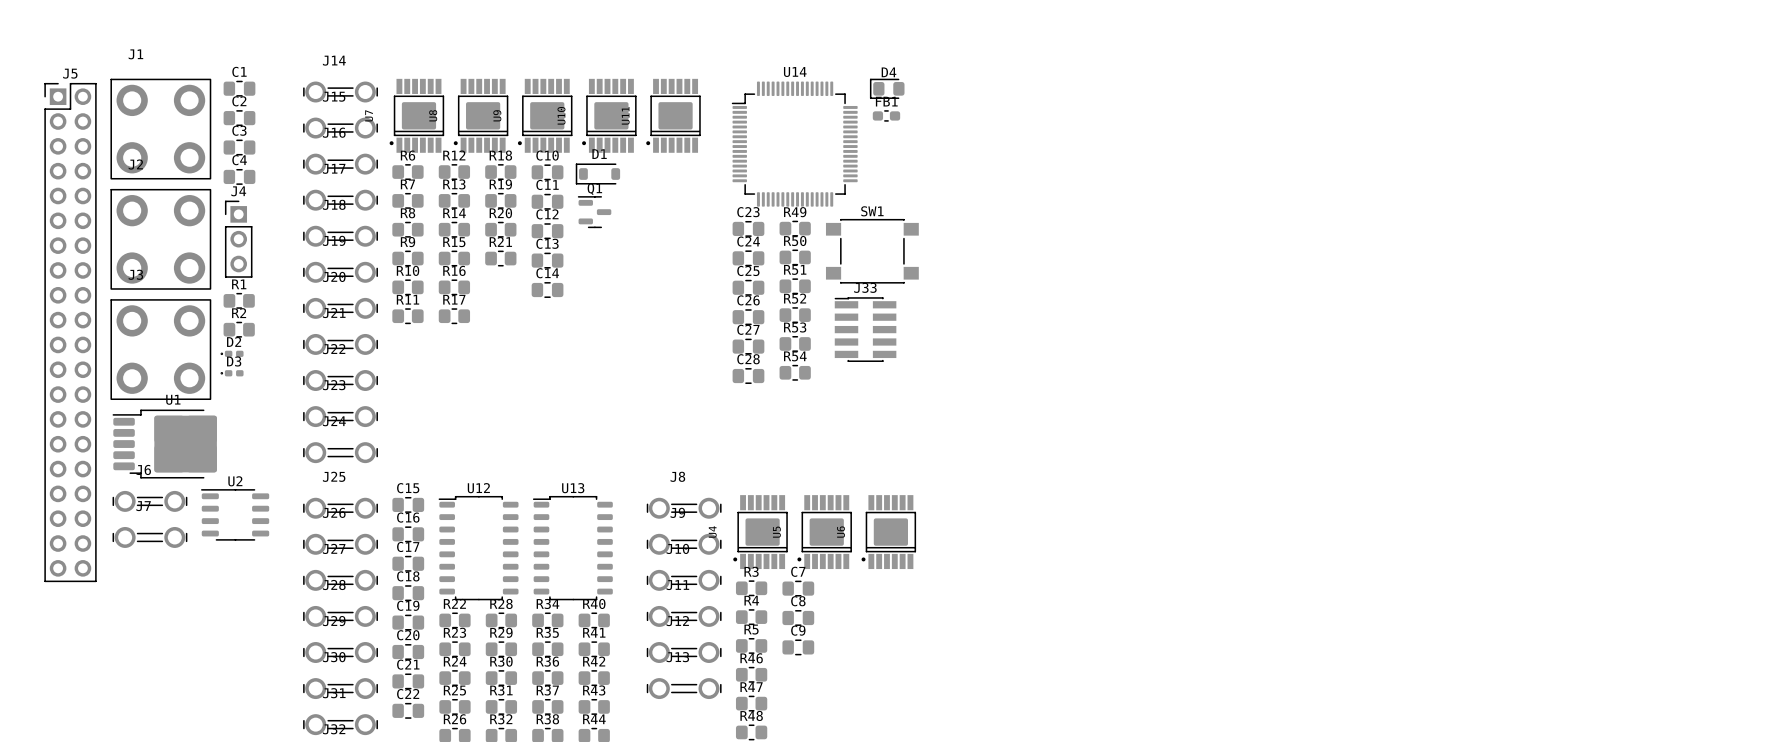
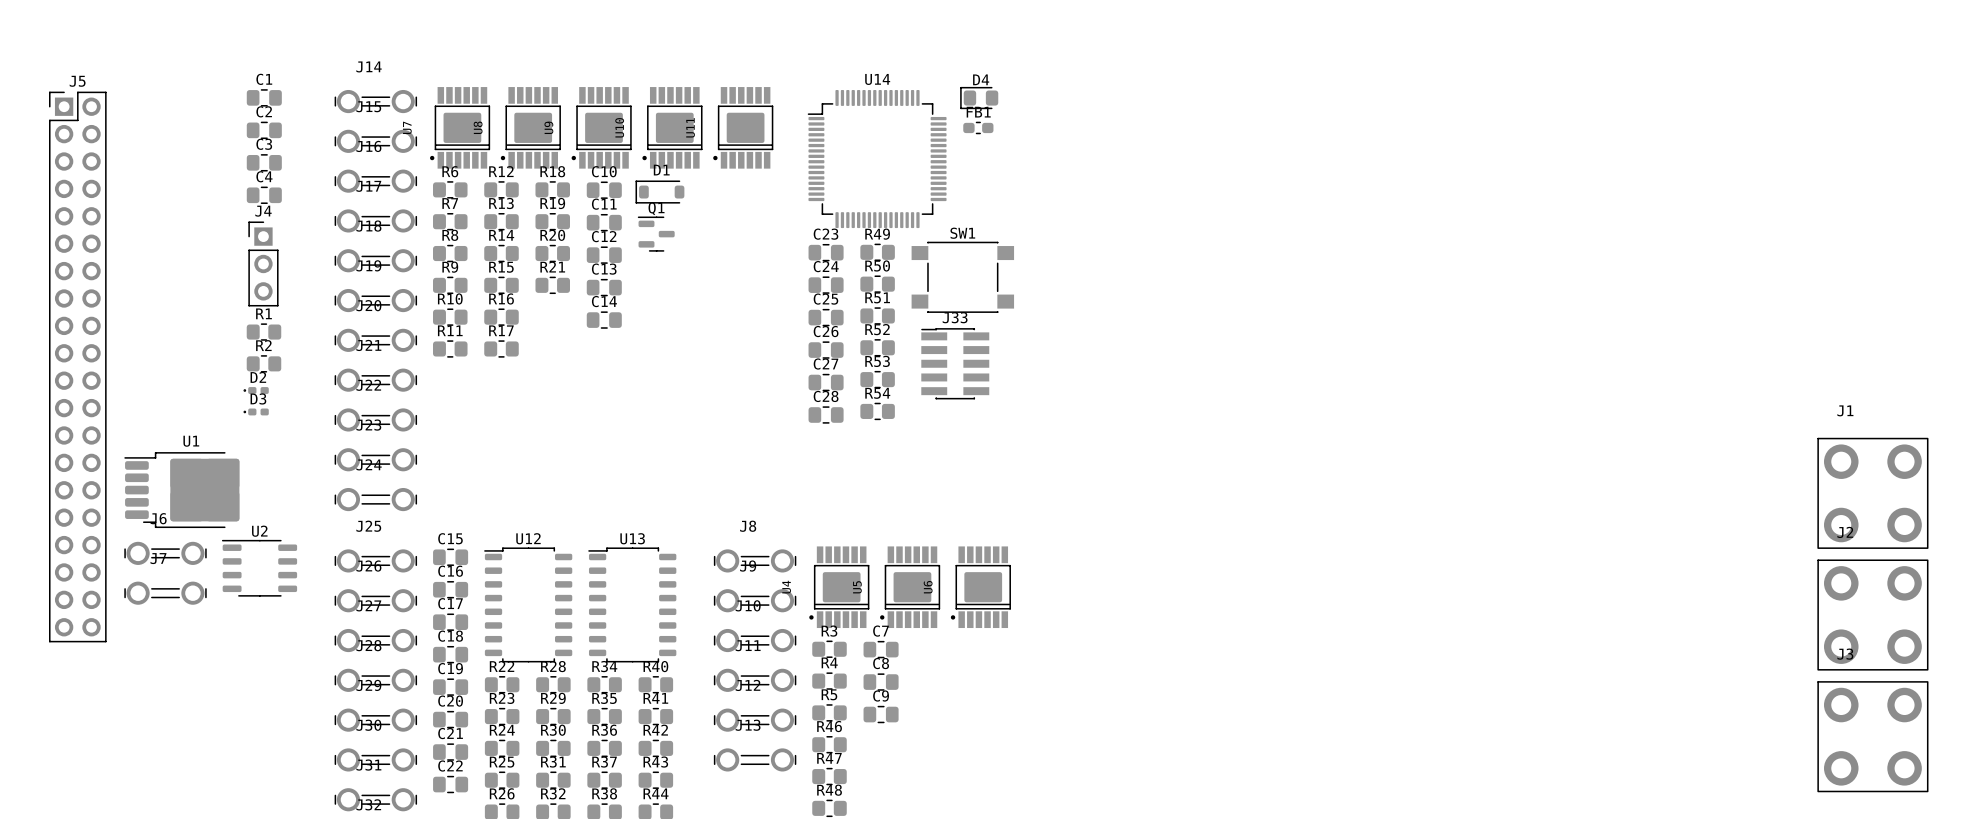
J1 position: (160, 129) -> (1872, 493)
J2 position: (160, 239) -> (1872, 615)
J3 position: (160, 349) -> (1872, 736)

